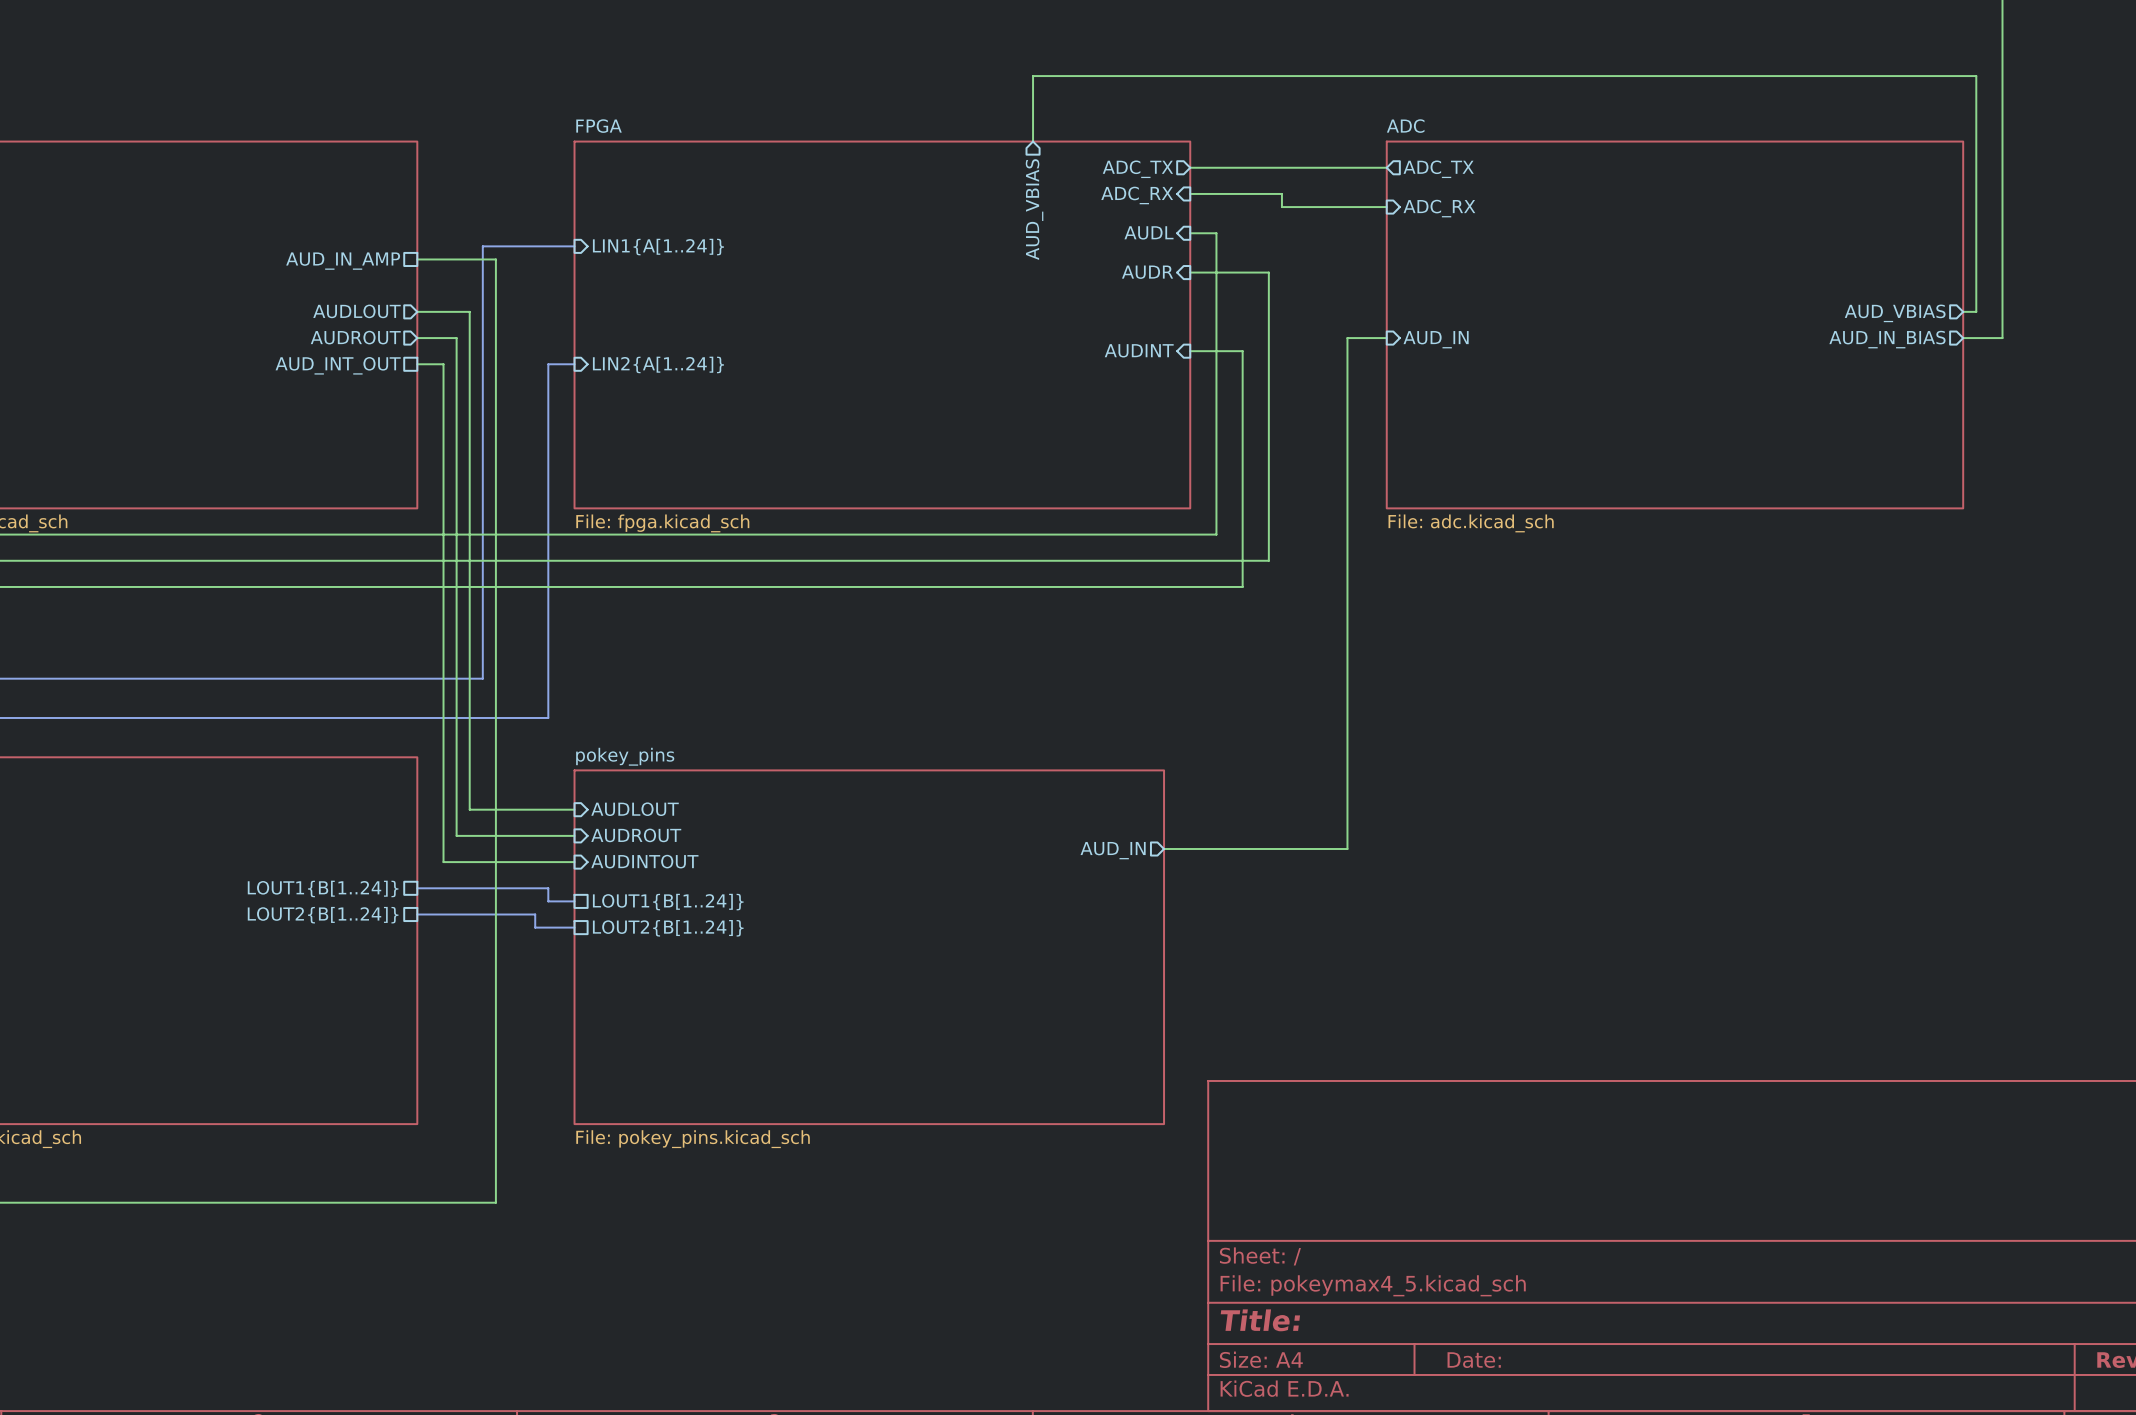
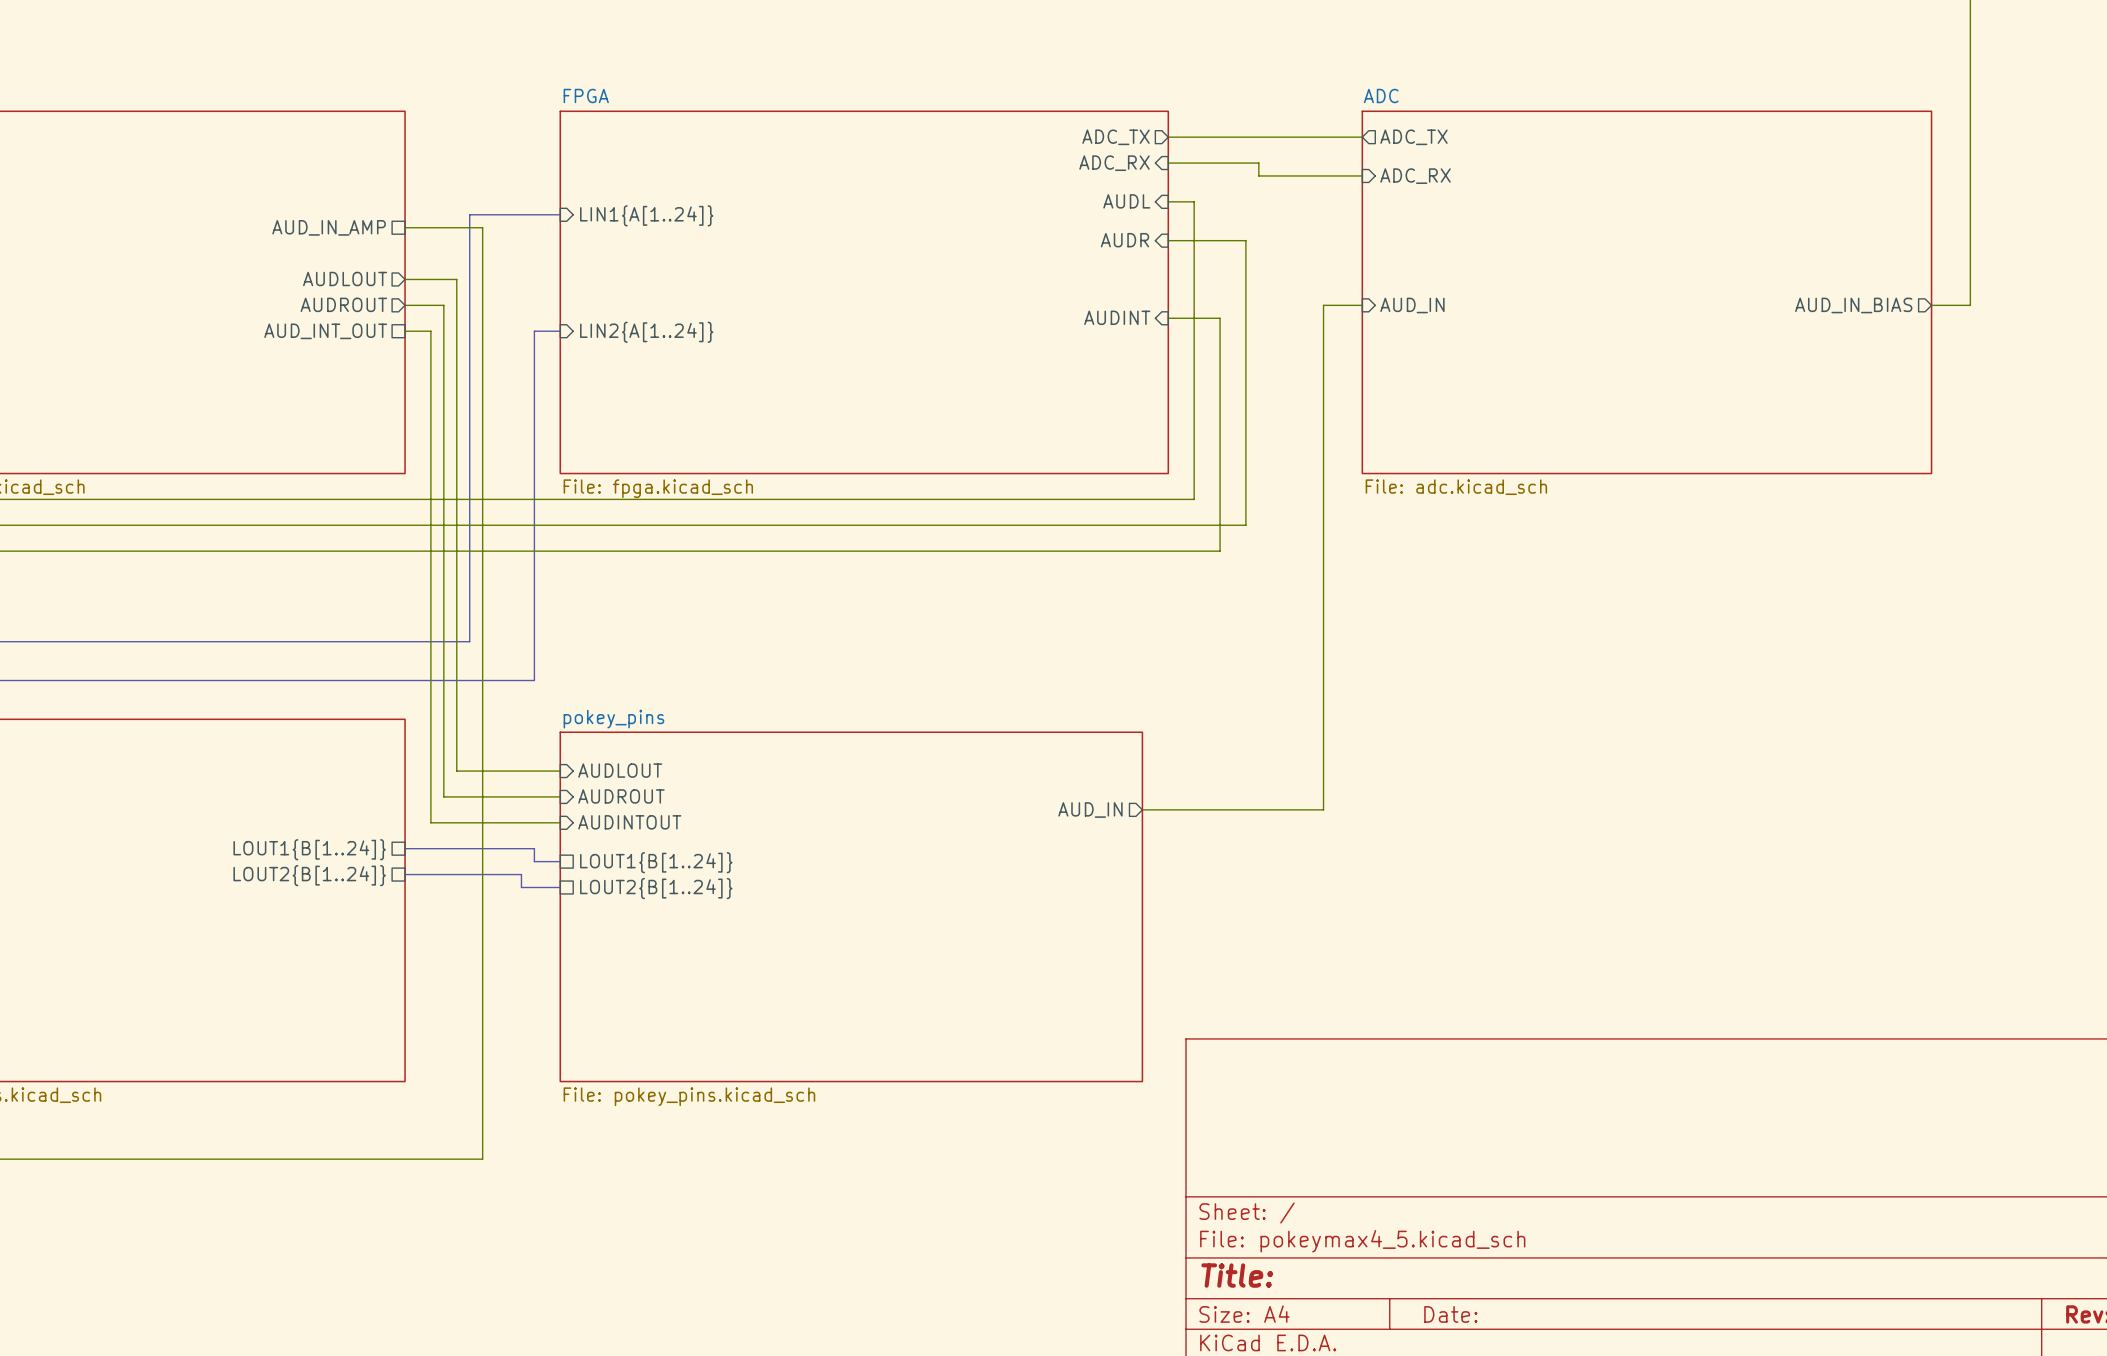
wire: (1033, 141) (1033, 76) (1976, 76) (1976, 311) (1963, 311) -> none
sheet pin: AUD_VBIAS (1034, 209) -> none
sheet pin: AUD_VBIAS (1895, 313) -> none

